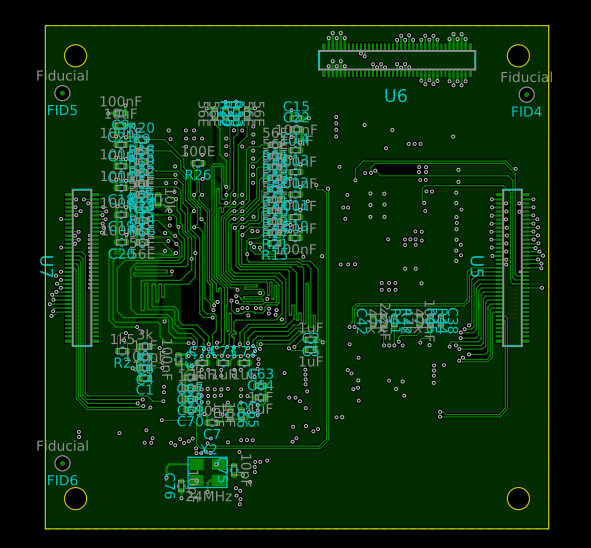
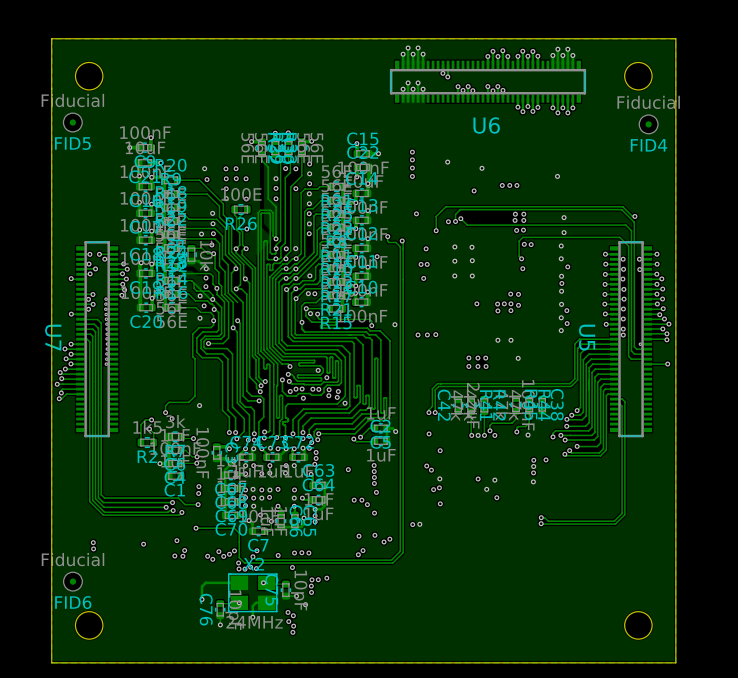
track: (175, 217) (178, 233) (184, 238) (184, 259) (180, 263) (136, 263) (130, 268) (130, 308) (136, 314) (167, 314) (172, 319) (172, 327) (178, 333) (191, 333) (197, 339) (197, 345) -> (213, 276) (213, 284) (217, 288) (217, 294) (224, 301) (224, 335) (221, 339) (206, 339) (203, 341) (203, 347) (227, 348) (232, 353) (232, 406) (244, 418) (244, 431) (240, 435)
track: (147, 231) (152, 237) (169, 237) (179, 247) (179, 255) (177, 257) (116, 257) (113, 261) (113, 319) (115, 322) (158, 322) (160, 324) (160, 336) (166, 343) (188, 343) -> (177, 294) (188, 294) (195, 300) (207, 300) (218, 312) (218, 330) (216, 331) (202, 331) (196, 337) (196, 352) (202, 357) (218, 357) (222, 362) (222, 410) (229, 417) (229, 432)
track: (175, 235) (181, 242) (181, 256) (178, 260) (125, 260) (117, 268) (117, 311) (123, 317) (166, 317) (168, 320) (168, 331) (174, 337) (191, 337) (193, 340) -> (194, 283) (194, 288) (196, 291) (208, 291) (212, 295) (212, 298) (221, 307) (221, 333) (219, 336) (205, 336) (201, 340) (201, 348) (206, 353) (222, 353) (227, 359) (227, 410) (235, 417) (235, 429)
track: (191, 238) (191, 269) (180, 280) (142, 280) (141, 309) (144, 309) (144, 284) (147, 283) (147, 308) (172, 309) (174, 311) (174, 323) (179, 328) (192, 328) (203, 339) (203, 349) -> (233, 302) (233, 327) (237, 332) (237, 402) (249, 415) (248, 440)
track: (195, 238) (195, 277) (188, 284) (165, 284) (163, 297) (161, 296) (161, 284) (159, 283) (158, 301) (155, 301) (155, 284) (152, 283) (152, 305) (174, 306) (178, 310) (178, 320) (182, 325) (197, 325) (208, 336) -> (237, 320) (240, 323) (240, 401) (245, 407) (250, 407) (254, 410) (254, 424)
track: (161, 242) (173, 252) (175, 252) (173, 254) (114, 253) (114, 251) (119, 251) (119, 248) (111, 248) (109, 251) (109, 320) (115, 327) (137, 327) -> (195, 307) (200, 312) (210, 312) (213, 315) (213, 324) (211, 327) (199, 327) (192, 334) (195, 396) (188, 402) (168, 402) (165, 405) (165, 412)
track: (188, 264) (185, 266) (136, 266) (136, 269) (166, 269) (167, 272) (134, 272) (133, 274) (170, 276) (171, 271) -> (228, 334) (228, 338) (223, 343) (208, 343)

